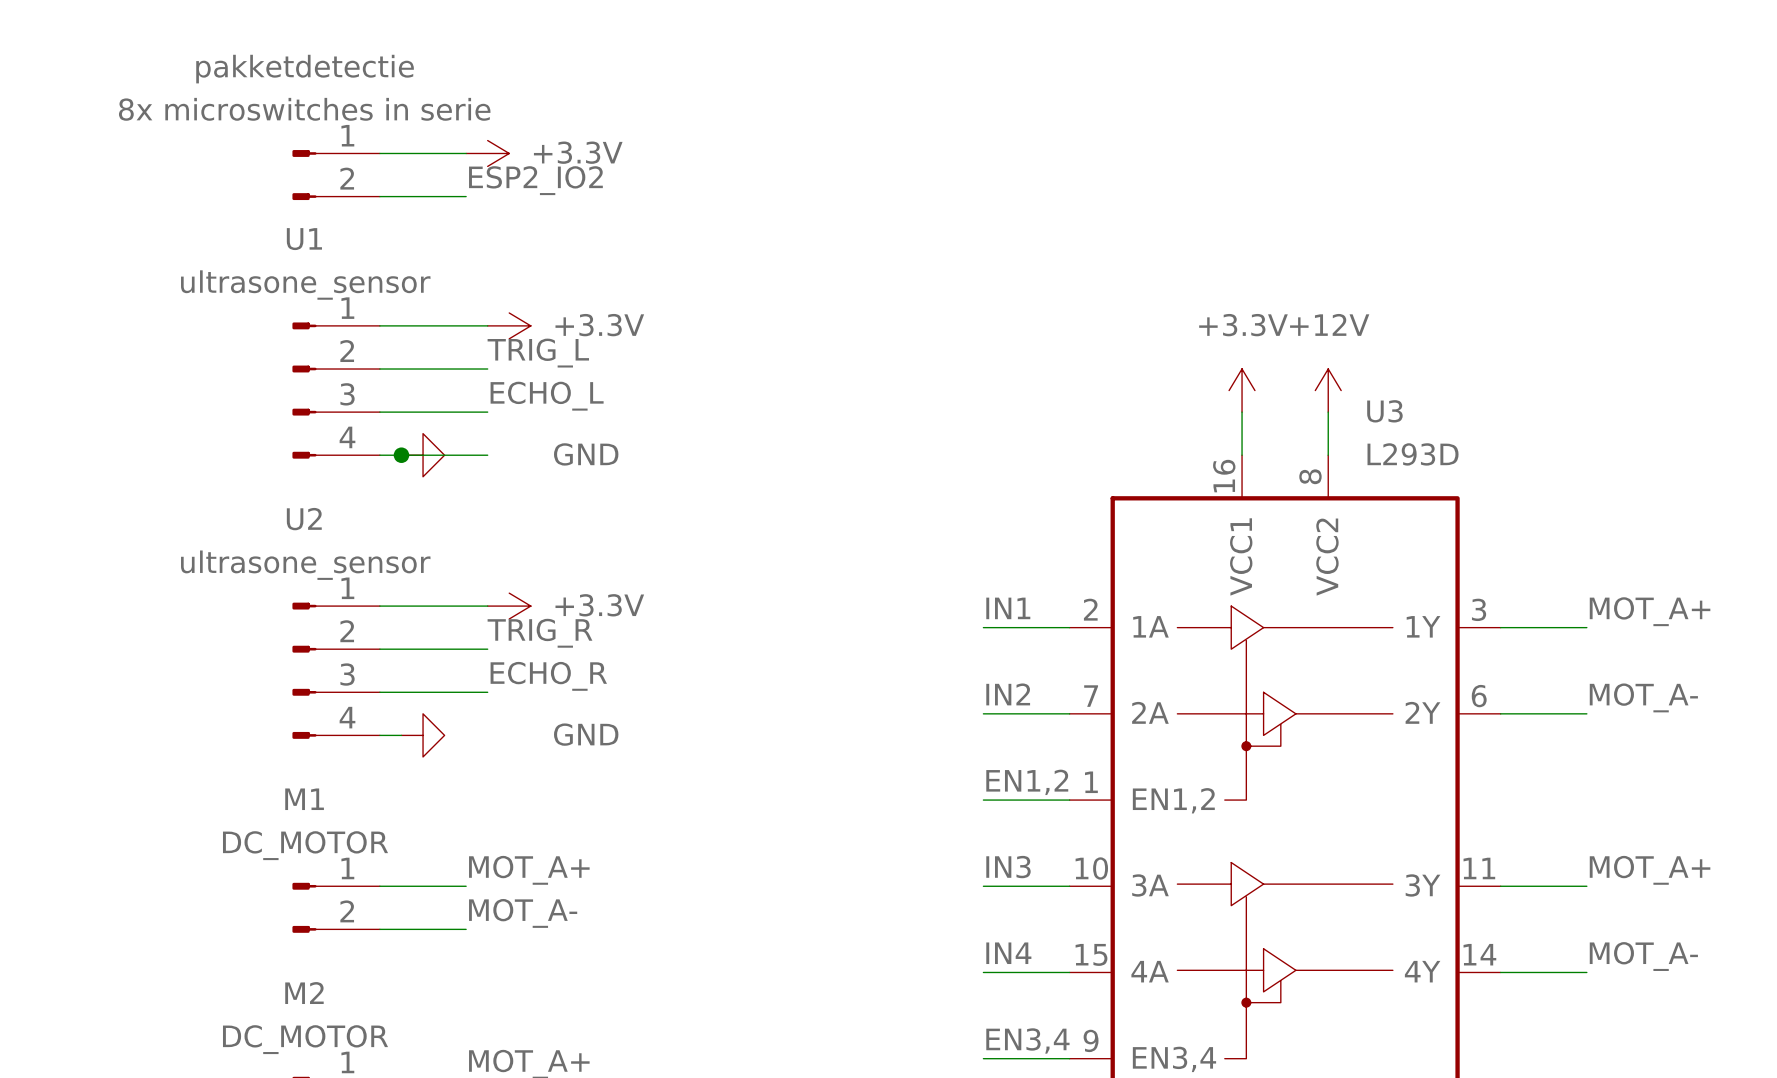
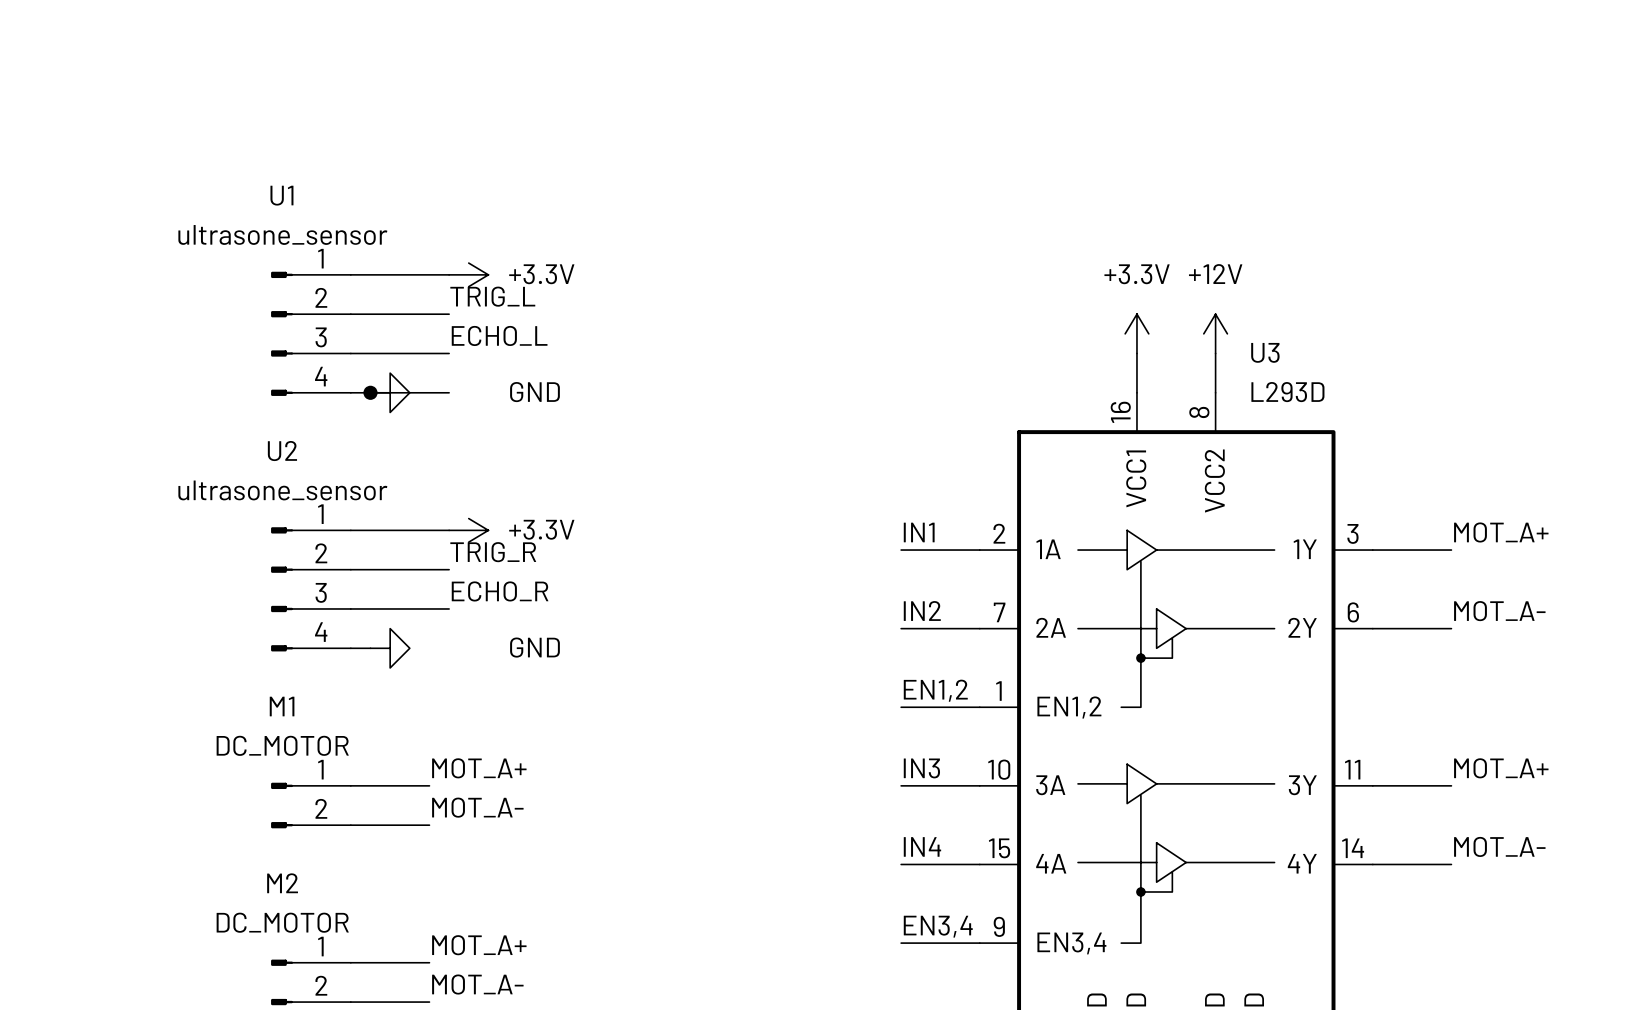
wire: (379, 153) (466, 153) -> none
power symbol: +3.3V (487, 153) -> none
pakketdetectie: 8x microswitches in serie (336, 175) -> none
label: ESP2_IO2 (535, 180) -> none
wire: (379, 196) (466, 196) -> none

